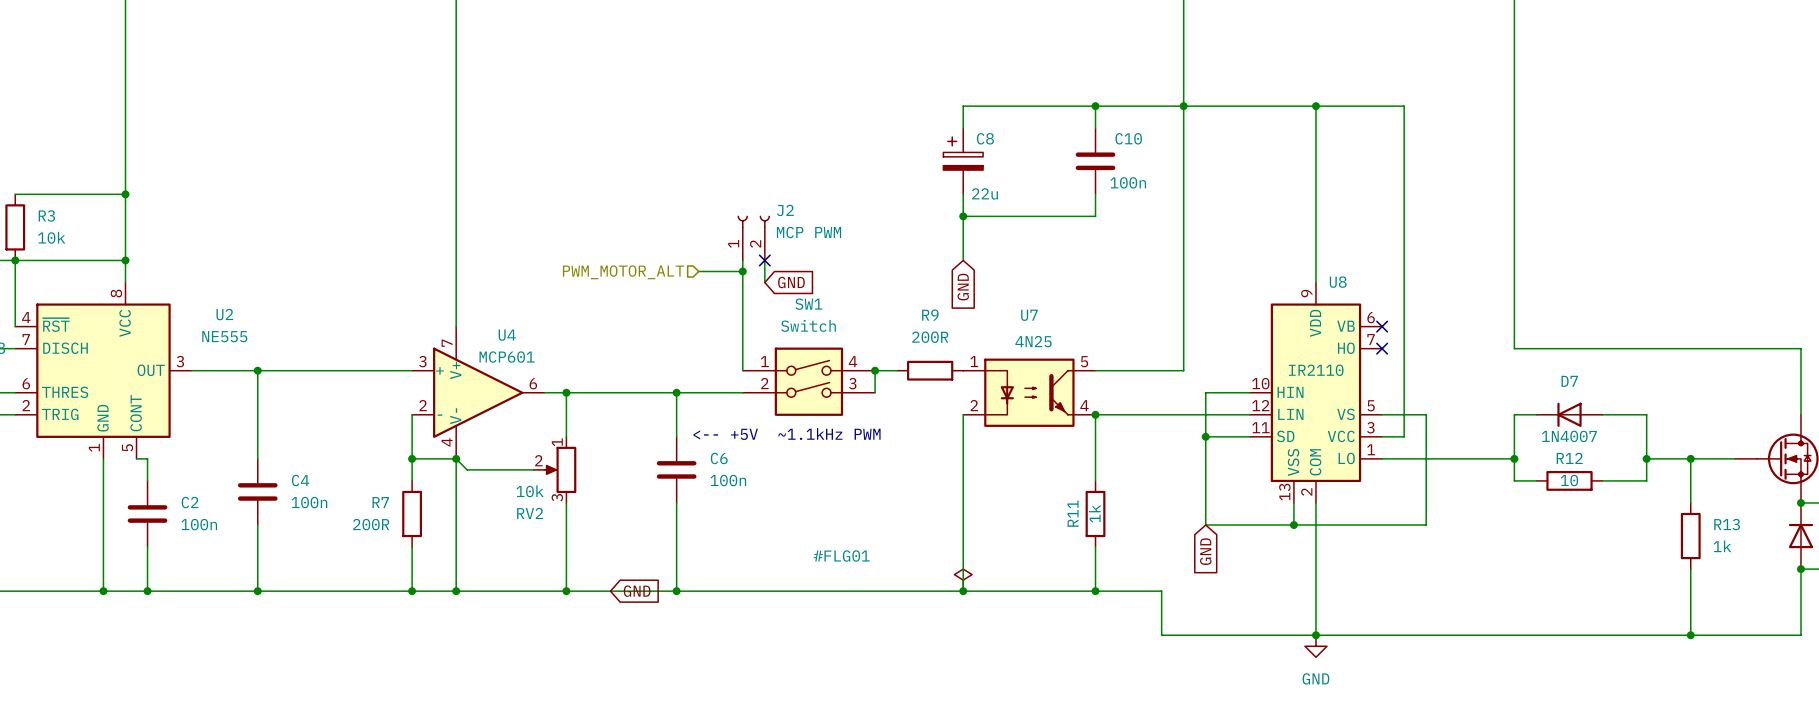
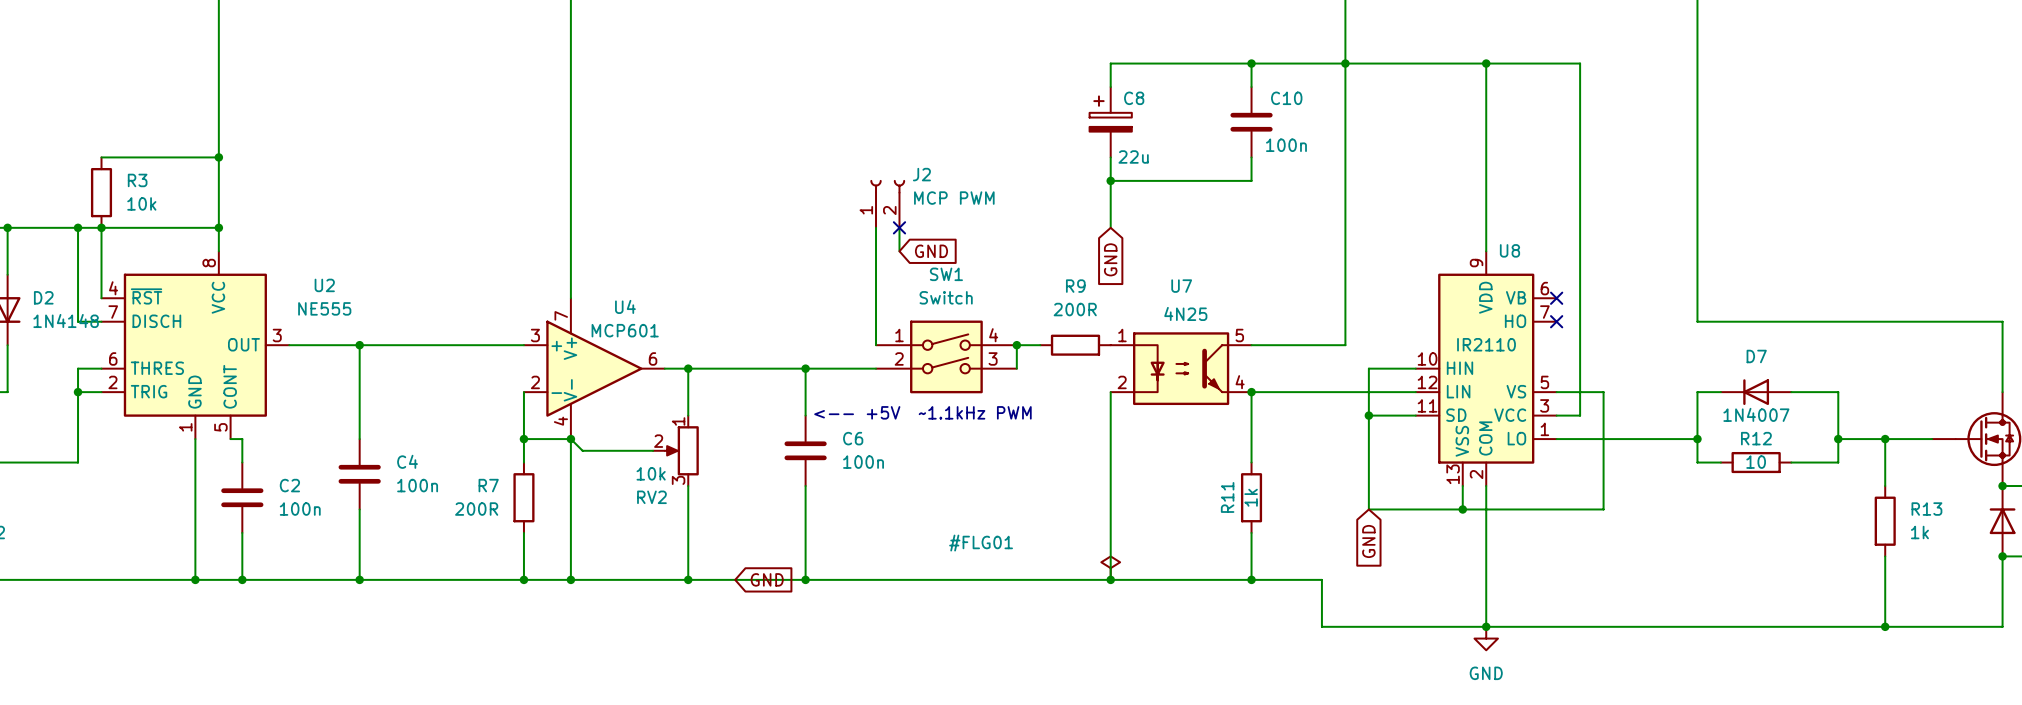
wire: (698, 271) (742, 271) -> none
junction: (742, 271) -> none
hierarchical label: PWM_MOTOR_ALT (623, 272) -> none

